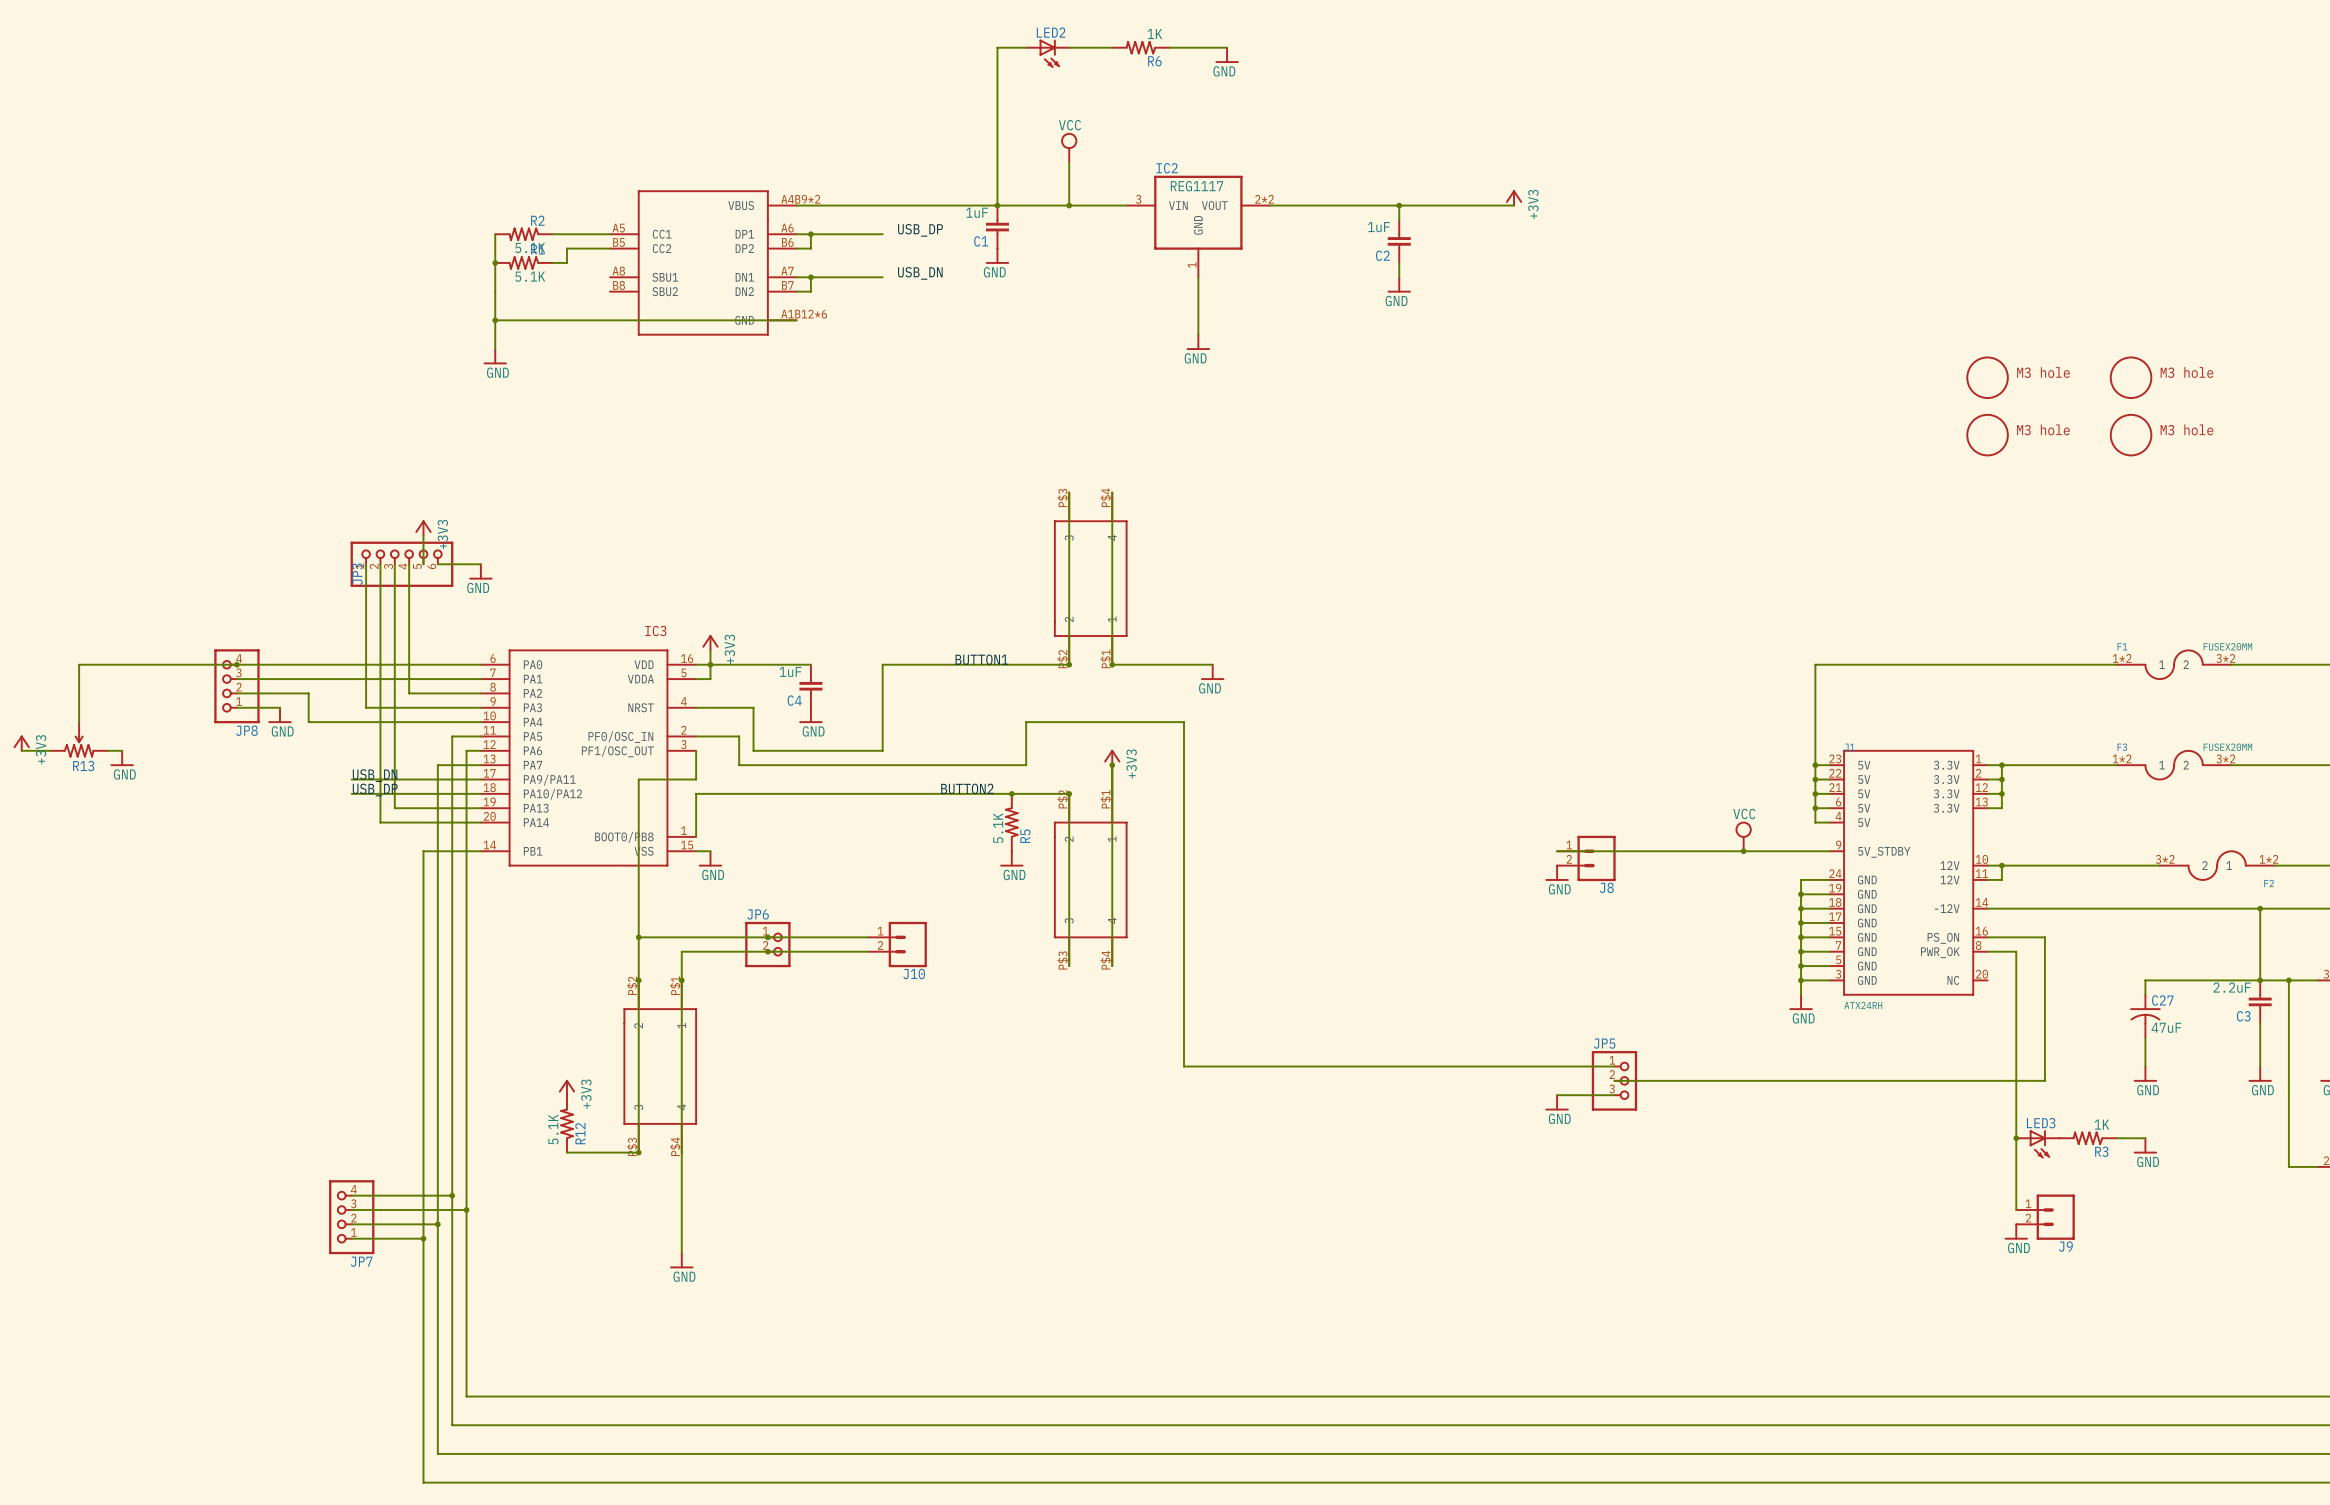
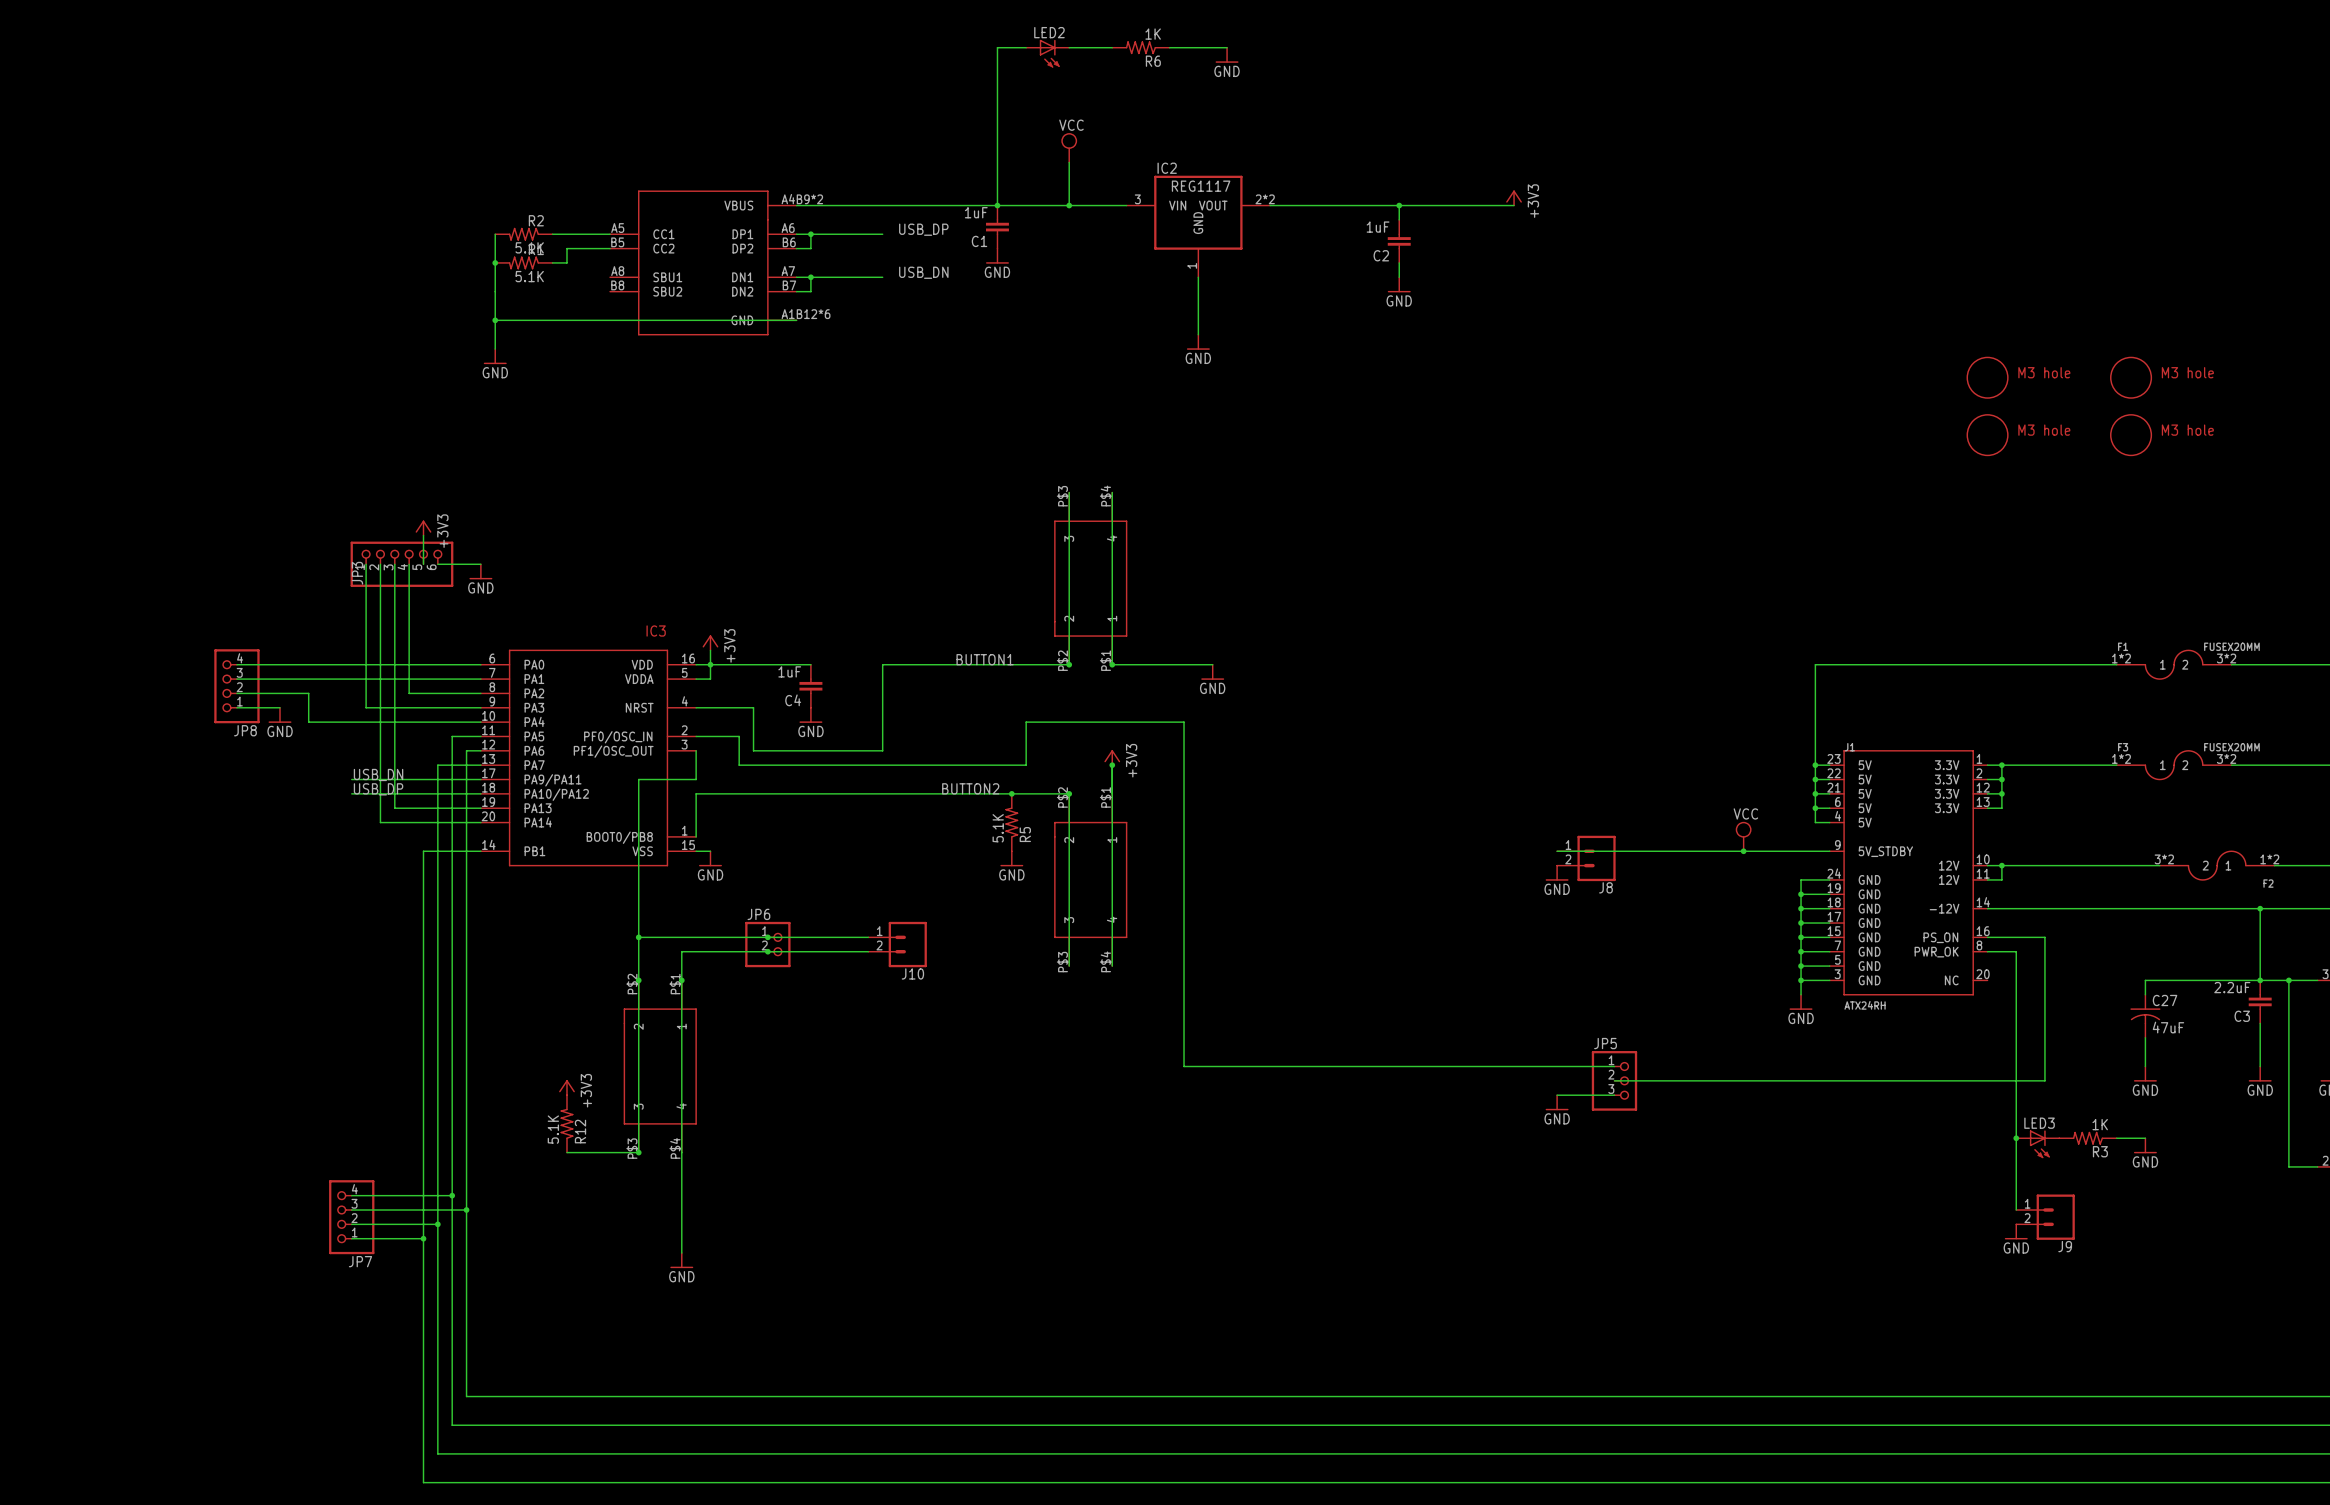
wire: (236, 664) (79, 664) (79, 722) -> none
junction: (236, 664) -> none
R13: (79, 739) -> none
power symbol: +3V3 (21, 743) -> none
wire: (21, 750) (50, 750) -> none
wire: (107, 750) (122, 750) -> none
power symbol: GND (122, 758) -> none

